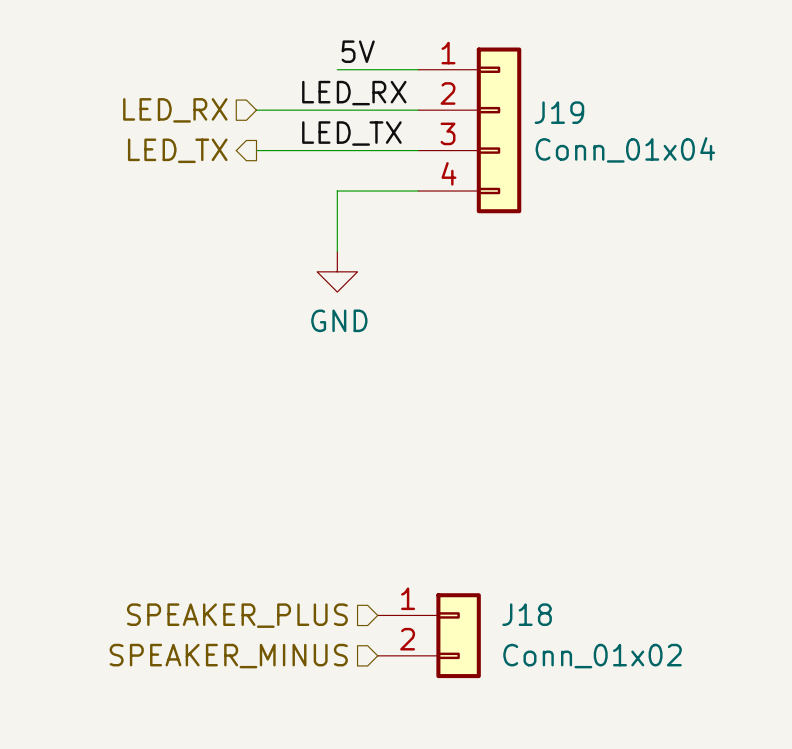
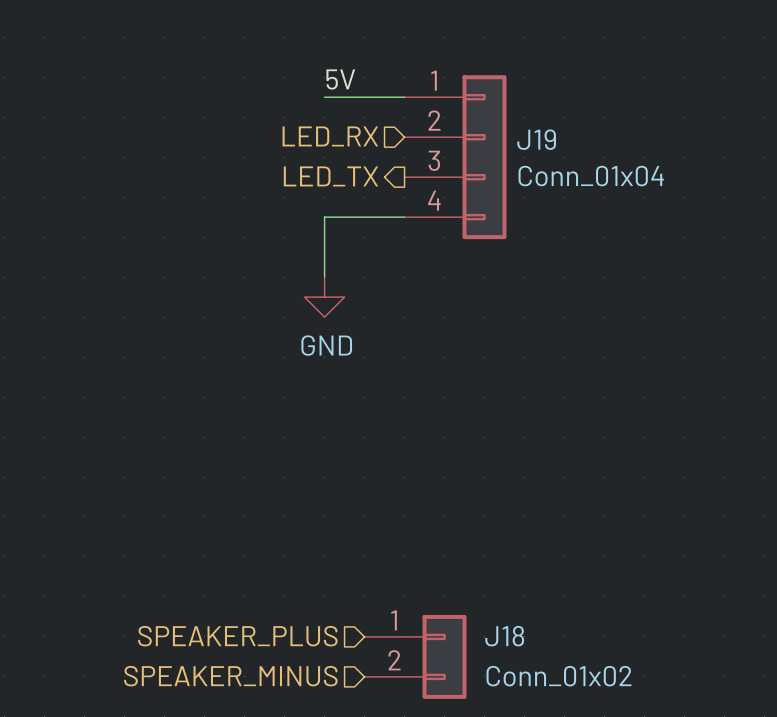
label: LED_RX (354, 93) -> none
hierarchical label position: LED_RX (175, 110) -> LED_RX (330, 136)
wire: (256, 110) (418, 110) -> none
label: LED_TX (351, 133) -> none
hierarchical label position: LED_TX (177, 150) -> LED_TX (330, 176)
wire: (256, 150) (418, 150) -> none

